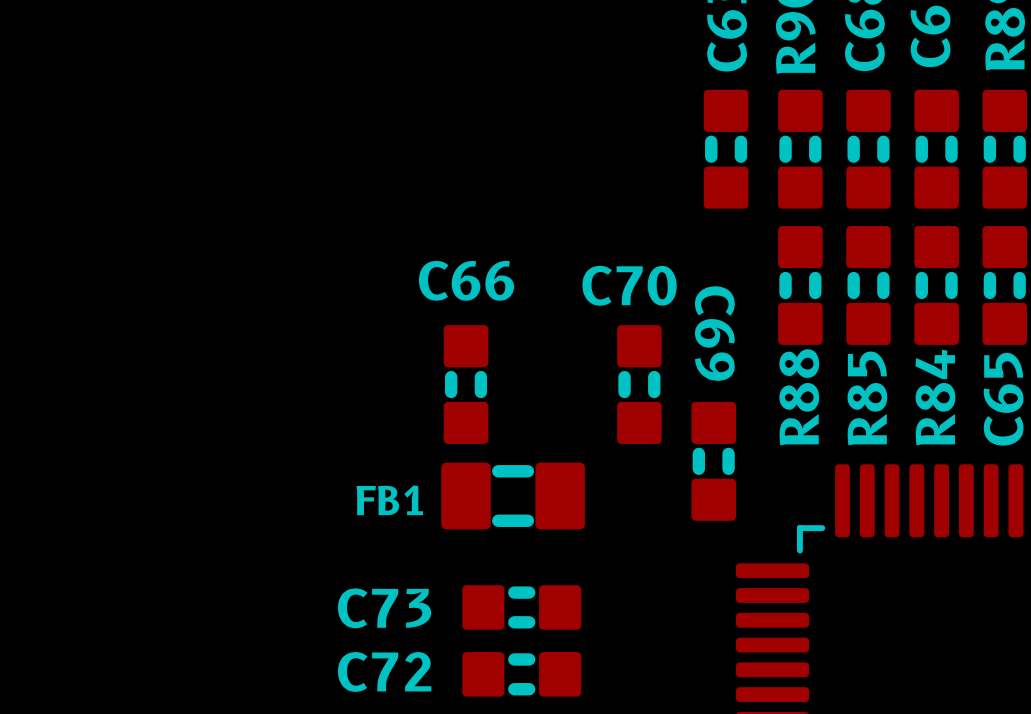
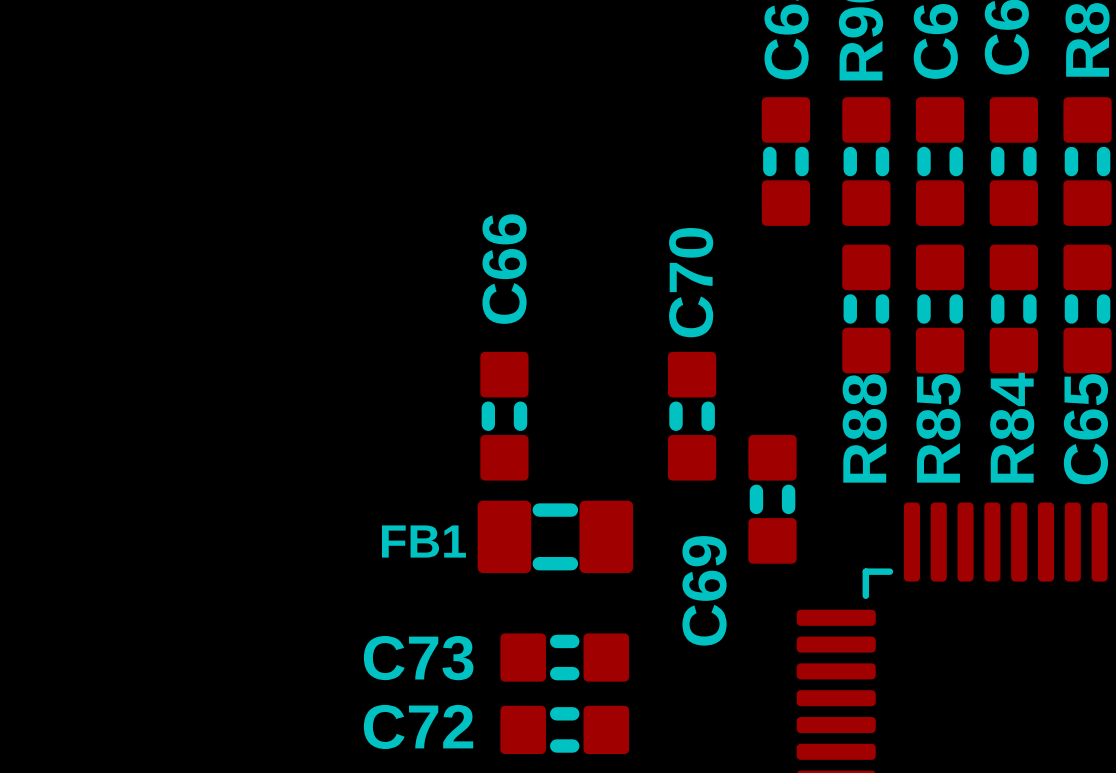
C66 name rotation: 0° (466, 280) -> 90° counterclockwise (504, 269)
C70 name rotation: 0° (629, 285) -> 90° counterclockwise (691, 282)
C69 name rotation: 0° (714, 333) -> 180° (704, 590)
C69 name position: C69 (714, 333) -> C69 (704, 590)

